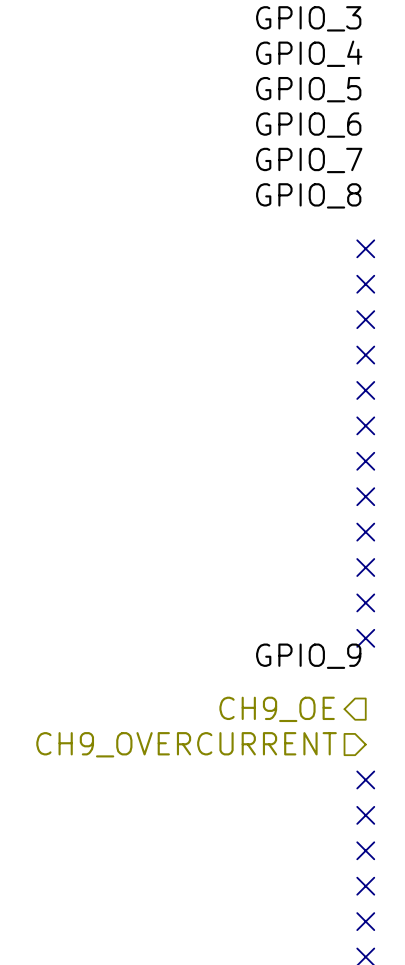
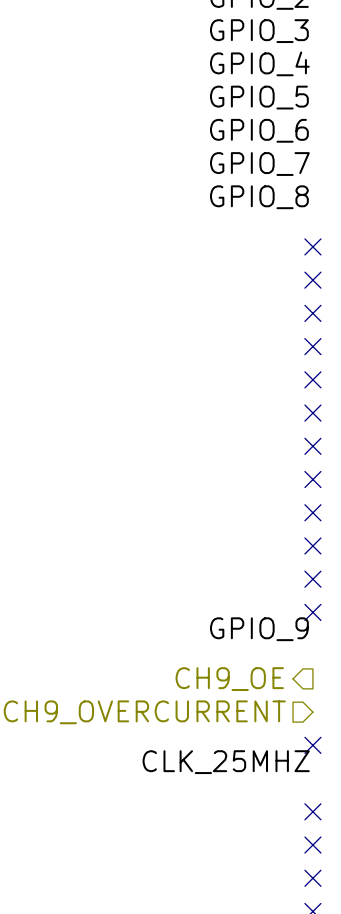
label: none -> CLK_25MHZ (226, 762)
no-connect mark: (365, 815) -> none

